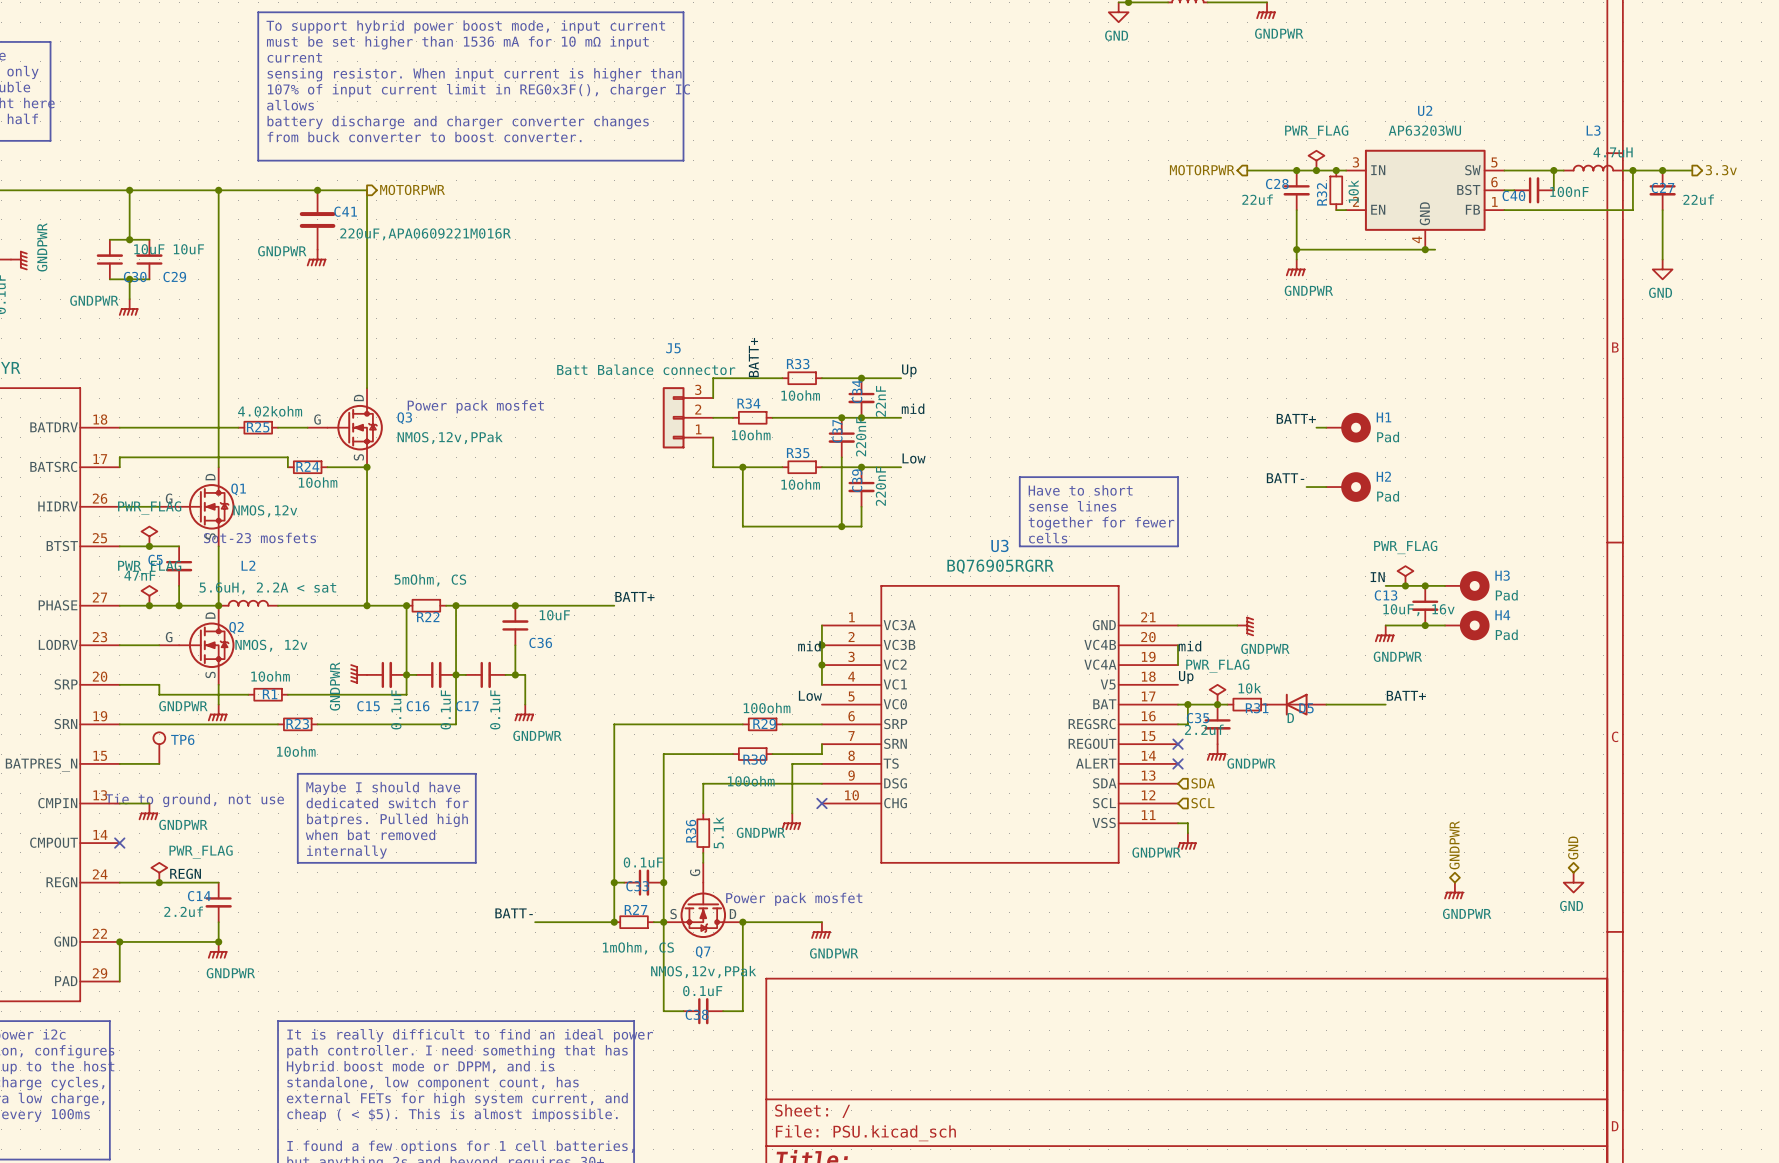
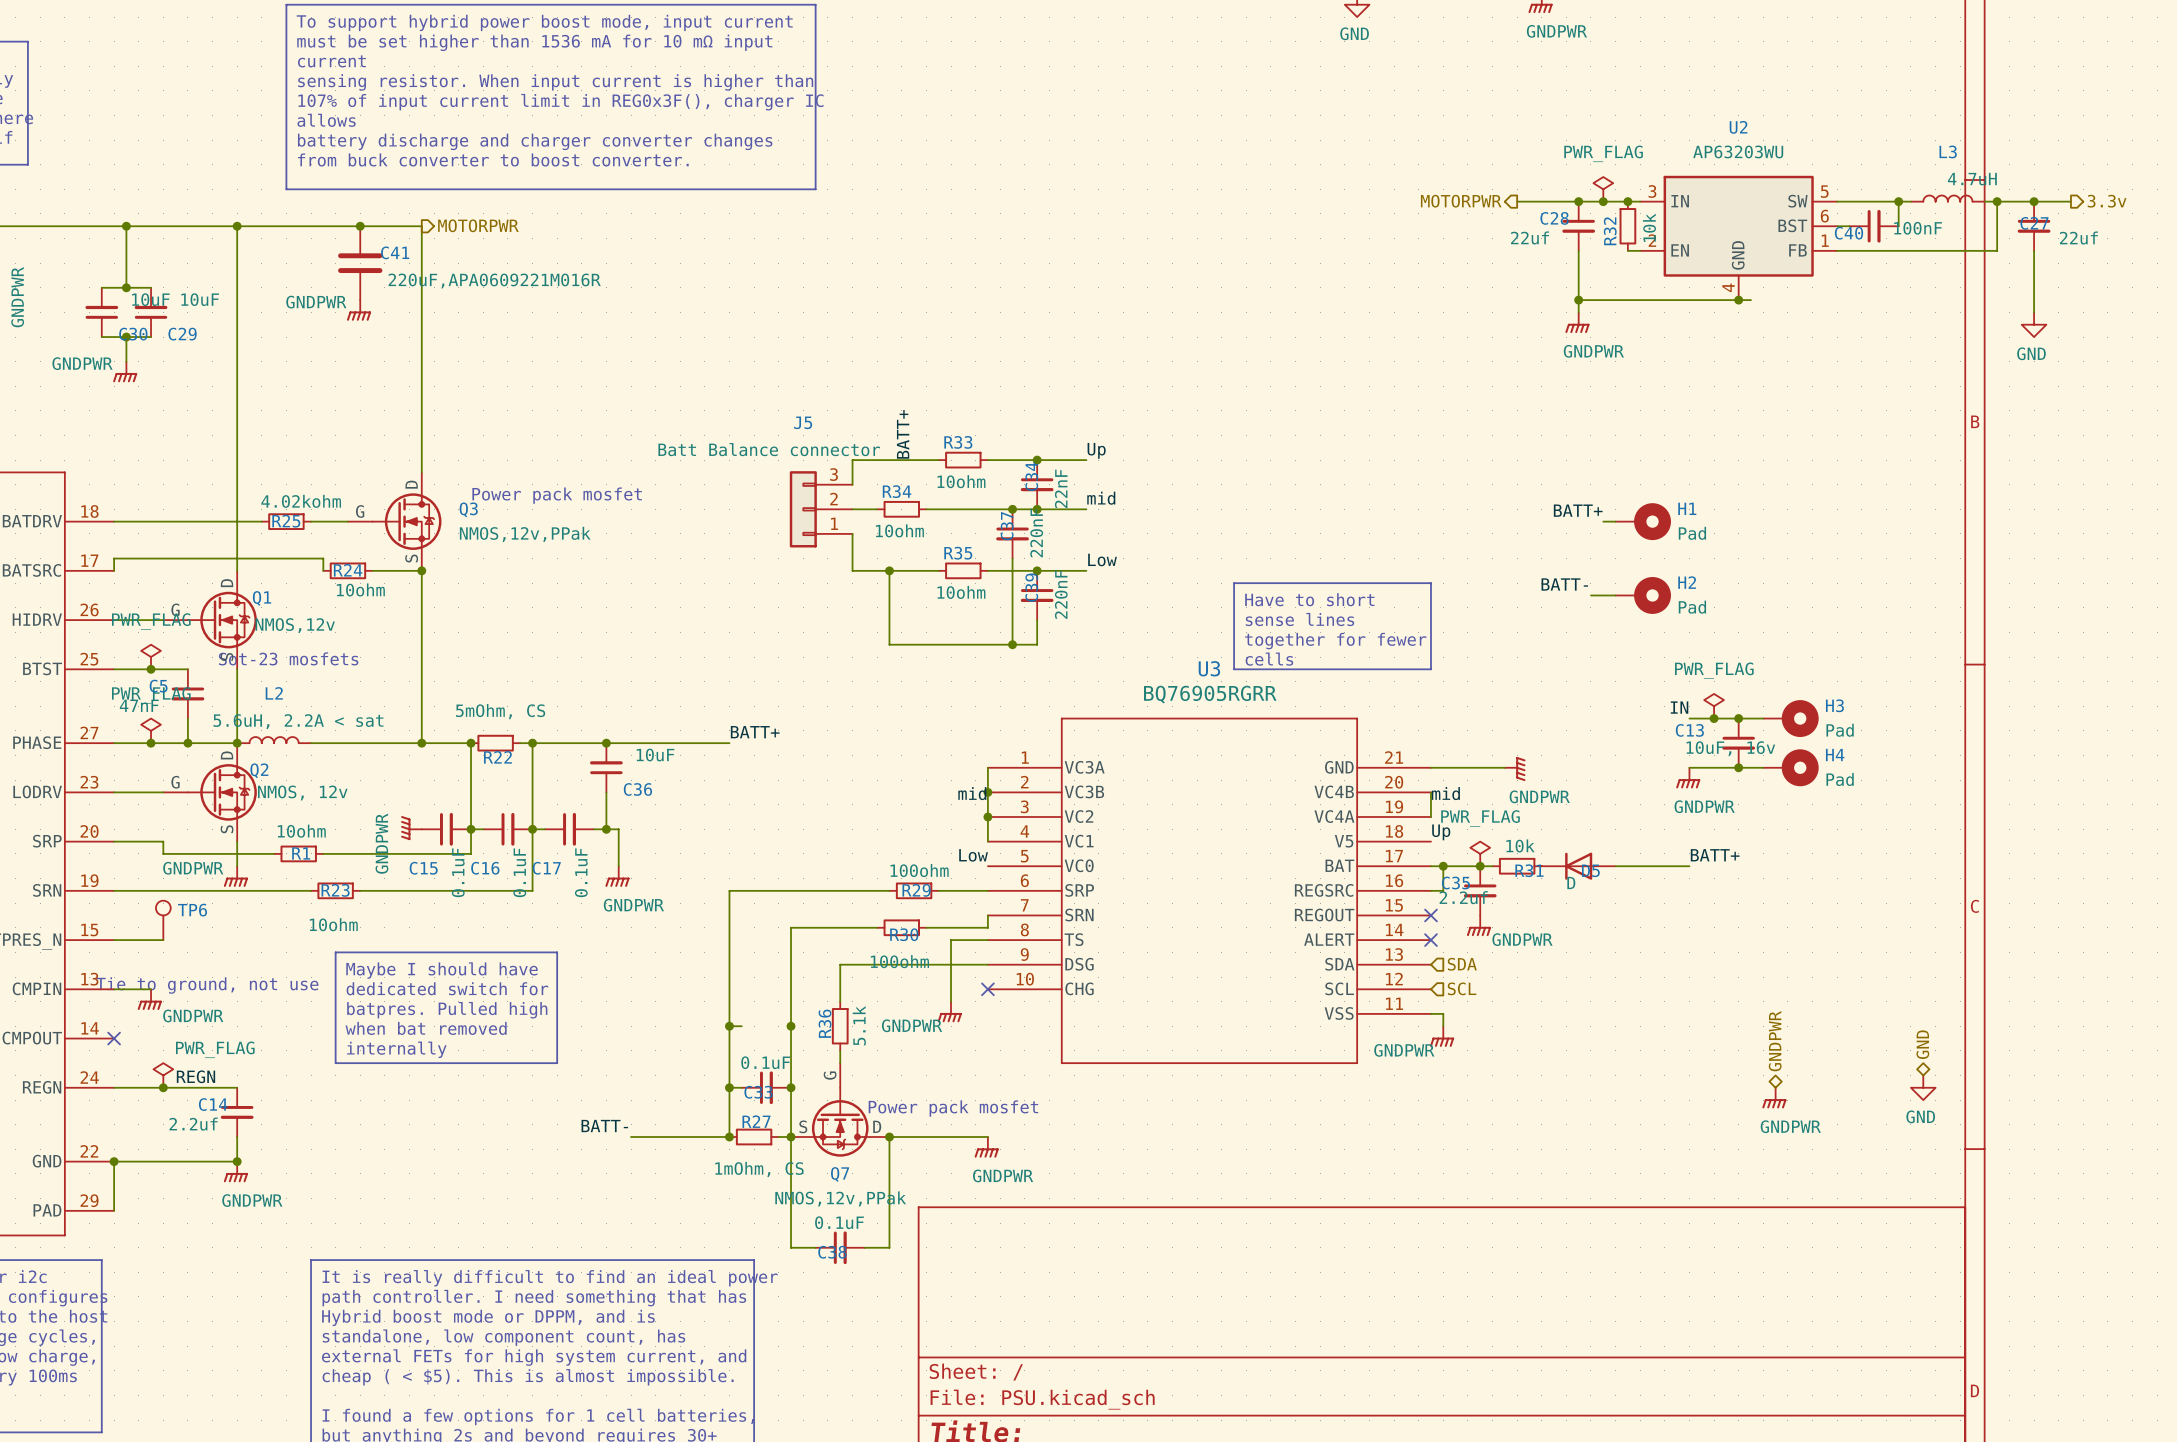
wire: none -> (729, 1026) (741, 1026)
junction: none -> (729, 1026)
junction: none -> (791, 1026)

